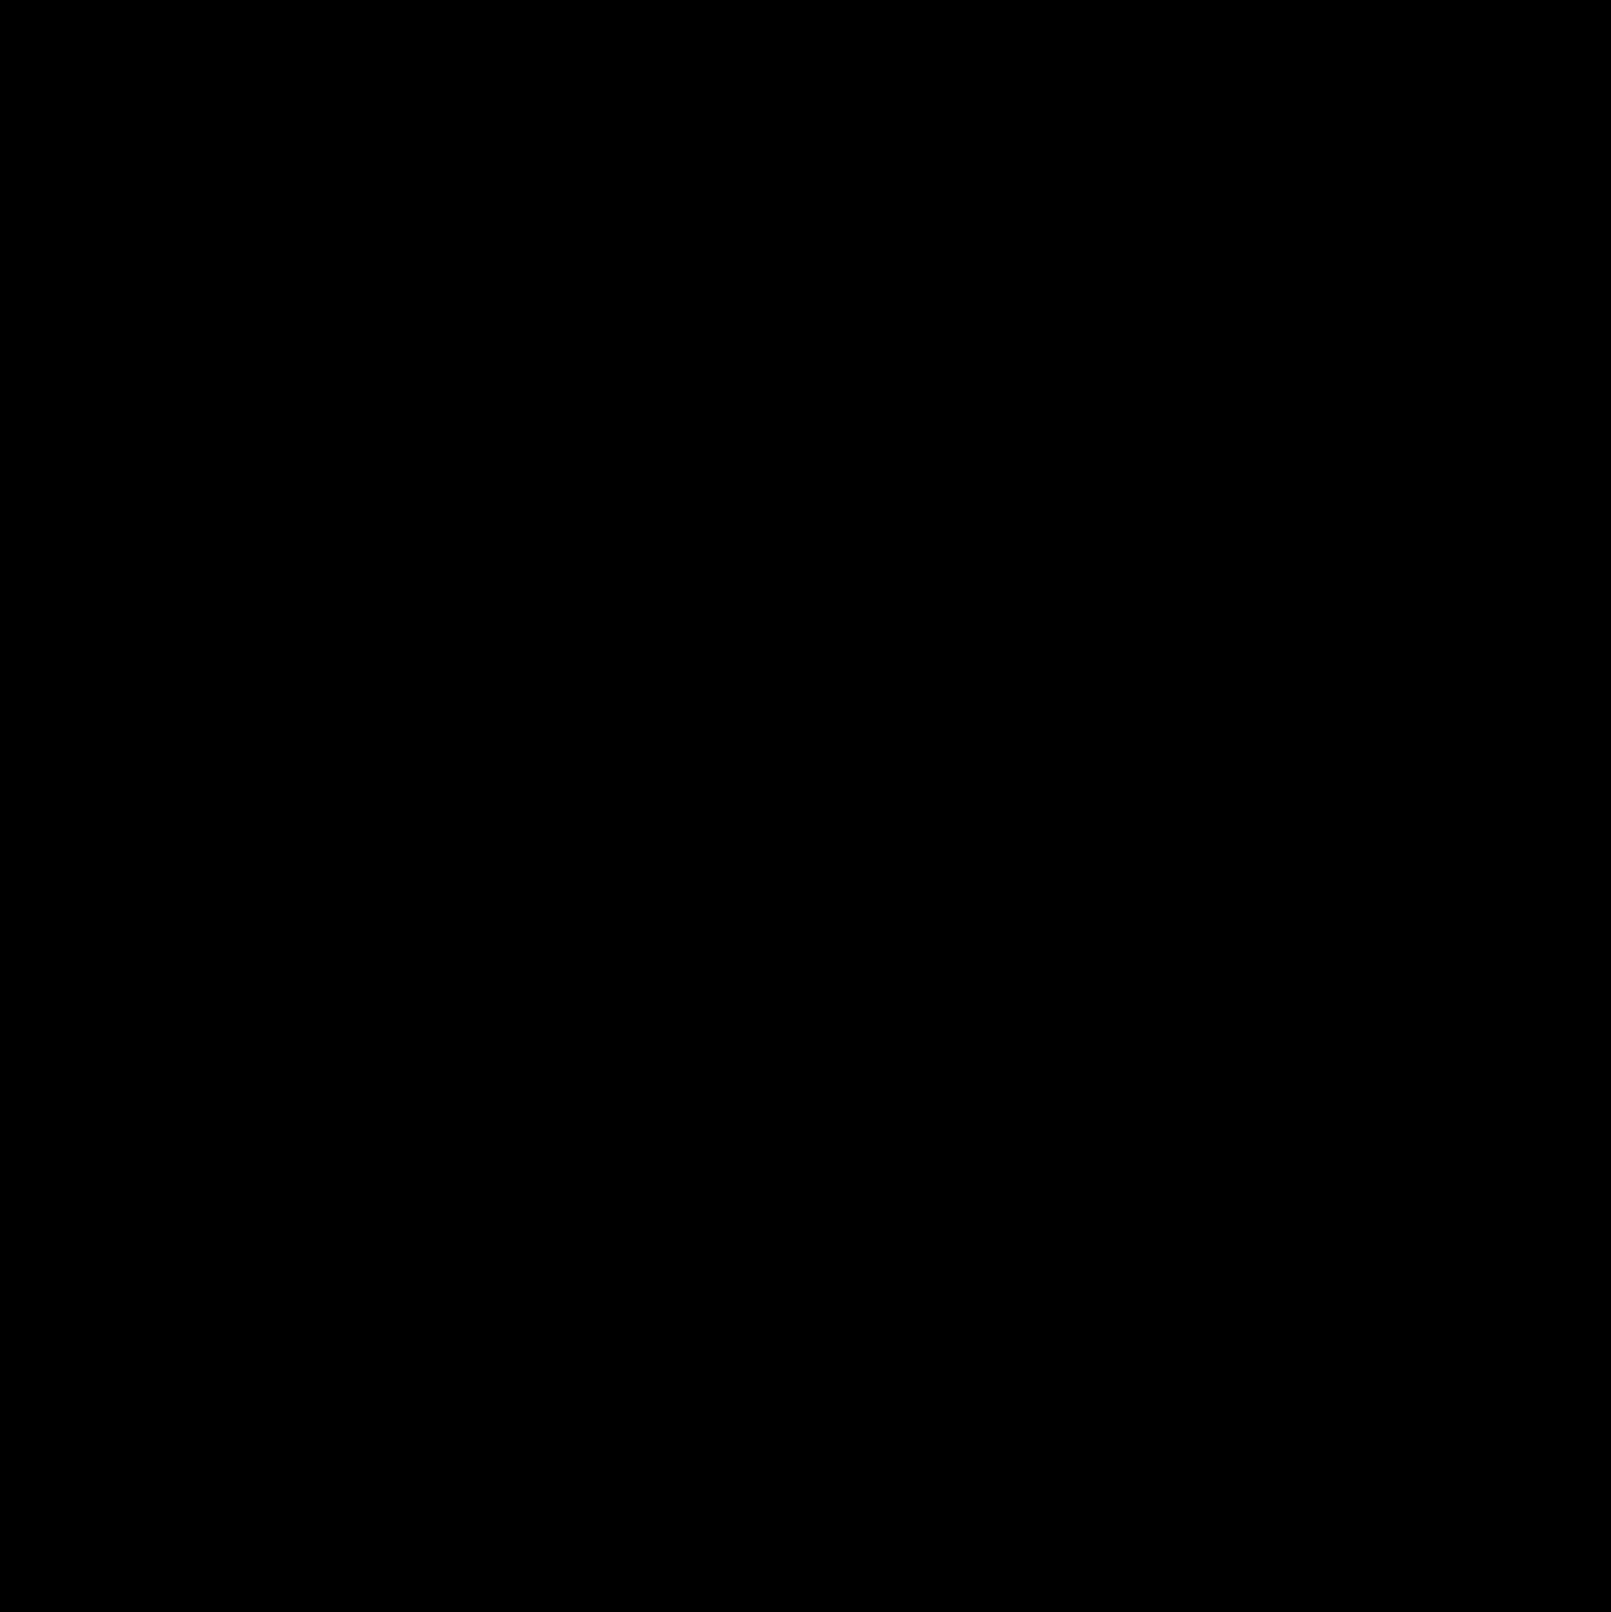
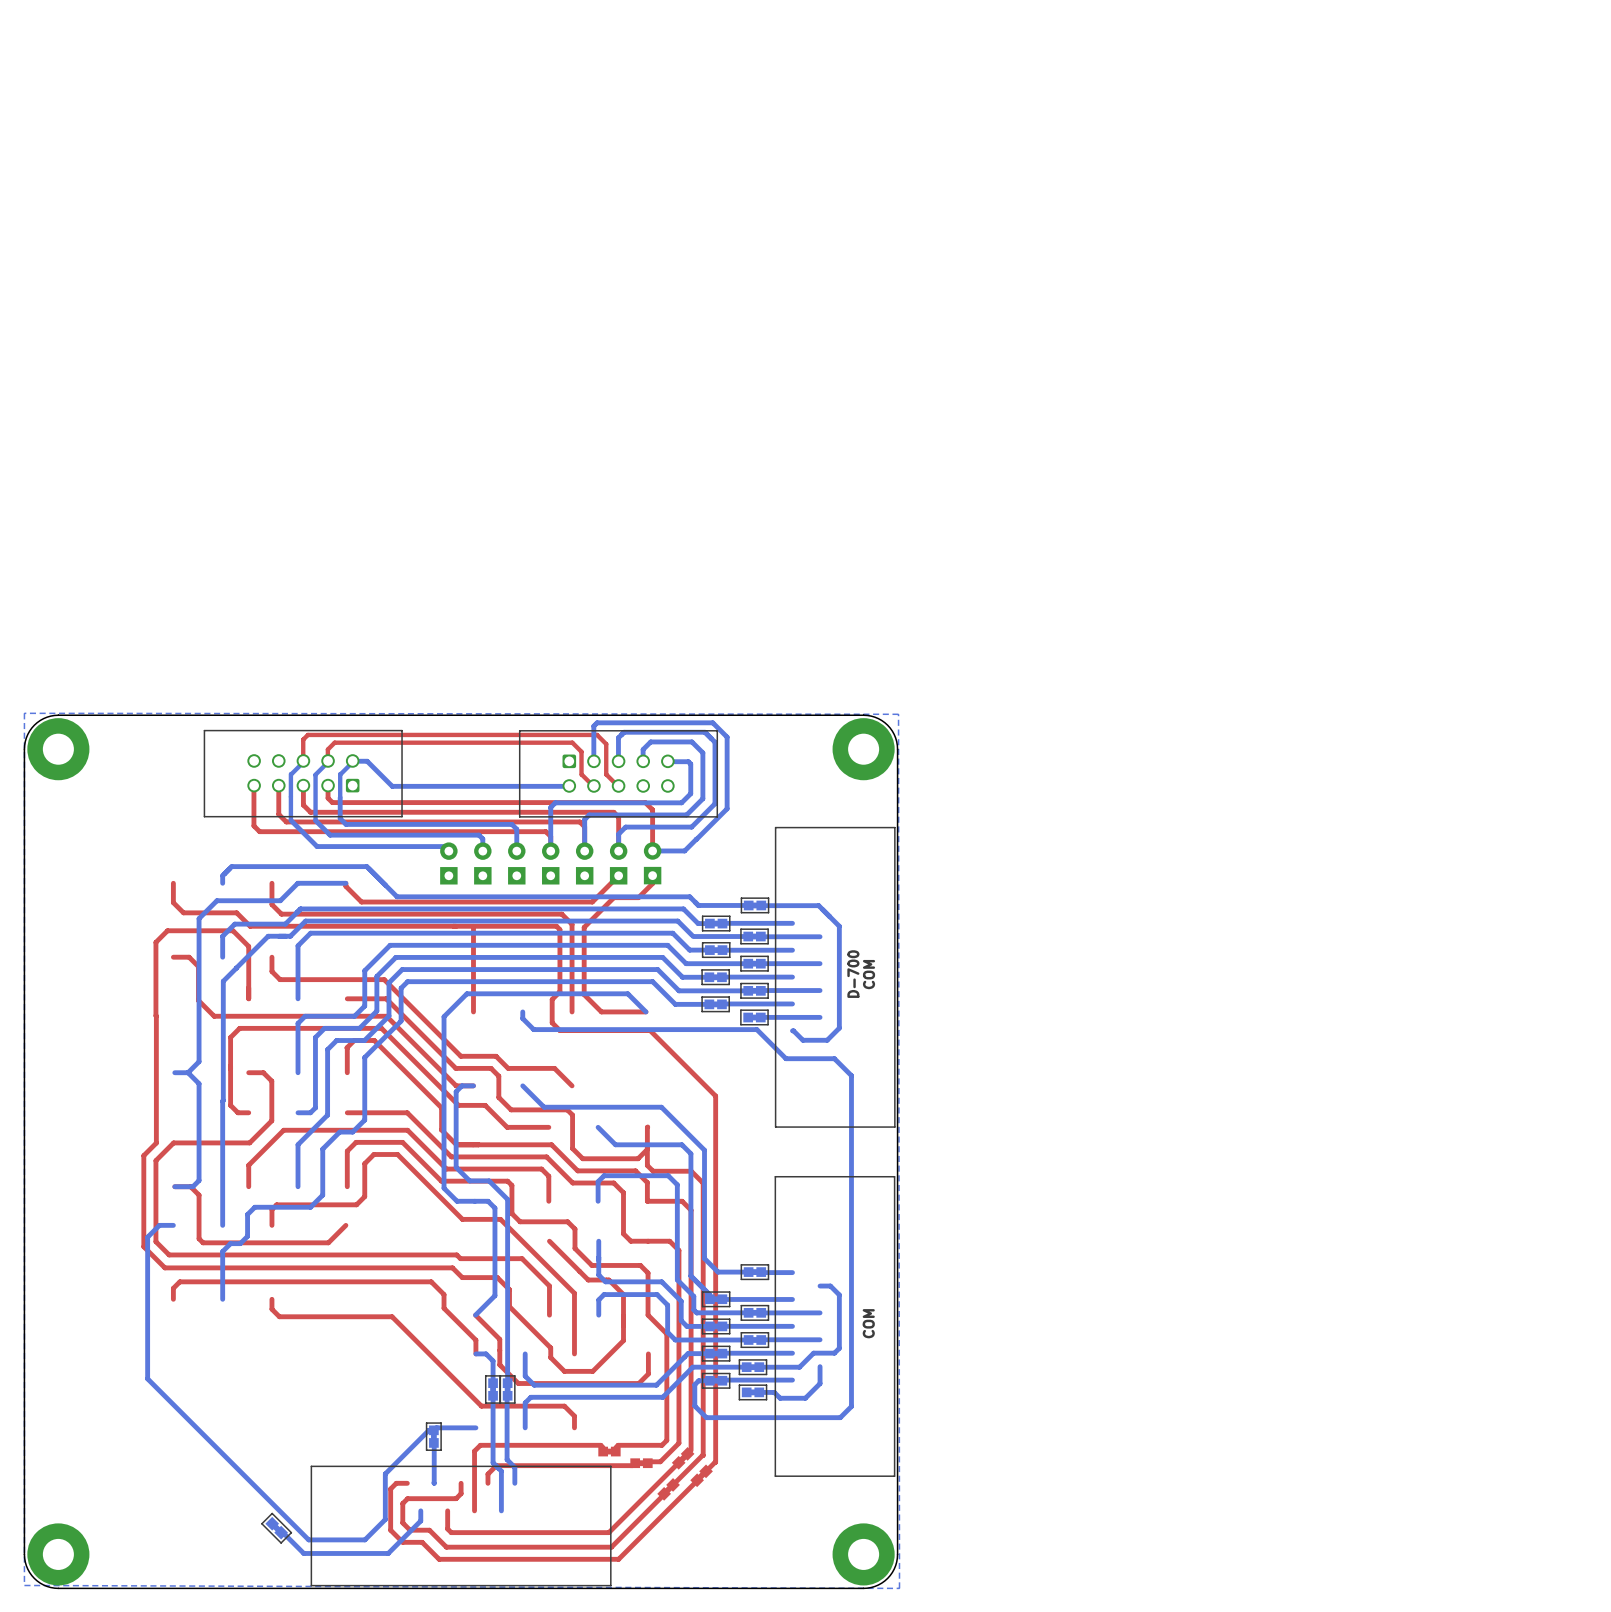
bottom zone outline: none -> (24, 713) (898, 714) (899, 1588) (24, 1585) (24, 713)
board edge: none -> (863, 715) (58, 715) (47, 717) (34, 725) (26, 737) (24, 749) (24, 1554) (26, 1565) (34, 1578) (47, 1586) (58, 1588) (863, 1588) (878, 1585) (887, 1578) (895, 1565) (897, 1554) (897, 749) (895, 737) (887, 725) (874, 717) (863, 715)
line: none -> (402, 730) (204, 730) (204, 816) (402, 816) (402, 730)
line: none -> (717, 730) (519, 730) (519, 816) (717, 816) (717, 730)
part: none -> (58, 749)
part: none -> (863, 749)
top track: none -> (303, 761) (303, 739) (307, 734) (597, 734) (606, 744) (606, 774)
top track: none -> (327, 761) (327, 749) (334, 742) (572, 742) (581, 751) (581, 774)
bottom track: none -> (352, 761) (367, 761) (392, 786) (569, 786)
bottom track: none -> (593, 761) (593, 726) (597, 722) (712, 722) (727, 737) (727, 808) (684, 850) (652, 850)
bottom track: none -> (618, 761) (618, 737) (624, 732) (705, 732) (715, 742) (715, 803) (691, 827) (625, 827) (618, 834) (618, 851)
bottom track: none -> (643, 761) (643, 749) (650, 741) (691, 741) (702, 752) (702, 798) (686, 814) (589, 814) (584, 819) (584, 851)
bottom track: none -> (667, 761) (688, 761) (690, 764) (690, 793) (681, 802) (555, 802) (550, 807) (550, 851)
bottom track: none -> (303, 762) (291, 774)
bottom track: none -> (328, 762) (315, 774)
bottom track: none -> (352, 762) (340, 774)
part: none -> (303, 773)
part: none -> (618, 773)
bottom track: none -> (290, 774) (290, 820) (317, 846) (445, 846) (448, 851)
bottom track: none -> (315, 774) (315, 820) (330, 835) (479, 835) (482, 838) (482, 851)
bottom track: none -> (340, 774) (340, 818) (346, 824) (511, 824) (516, 829) (516, 851)
top track: none -> (581, 774) (593, 786)
top track: none -> (606, 774) (618, 786)
top track: none -> (253, 785) (253, 825) (259, 831) (545, 831) (550, 836) (550, 851)
top track: none -> (278, 785) (278, 814) (286, 821) (579, 821) (584, 826) (584, 851)
top track: none -> (303, 785) (303, 805) (310, 812) (613, 812) (618, 817) (618, 851)
top track: none -> (328, 785) (328, 798) (332, 802) (645, 802) (652, 809) (652, 850)
line: none -> (894, 827) (894, 1127) (775, 1127) (775, 827) (894, 827)
part: none -> (448, 863)
part: none -> (482, 863)
part: none -> (516, 863)
part: none -> (550, 863)
part: none -> (584, 863)
part: none -> (618, 863)
part: none -> (652, 863)
top track: none -> (618, 875) (592, 902) (361, 902) (345, 886) (345, 883)
top track: none -> (652, 875) (652, 883) (638, 897) (613, 897) (584, 927) (584, 994) (601, 1011) (645, 1011)
top track: none -> (173, 883) (173, 902) (183, 912) (236, 912) (250, 926) (556, 926) (559, 929) (559, 991) (552, 999) (552, 1022) (559, 1030) (650, 1030) (715, 1096) (715, 1462) (706, 1471)
bottom track: none -> (222, 883) (222, 875) (231, 866) (366, 866) (397, 896) (689, 896) (698, 905)
top track: none -> (271, 883) (271, 904) (281, 914) (561, 914) (572, 924) (572, 1011)
bottom track: none -> (345, 883) (297, 883) (280, 900) (216, 900) (199, 918) (199, 1061) (188, 1072)
bottom track: none -> (748, 905) (698, 905)
part: none -> (754, 905)
bottom track: none -> (761, 905) (818, 905) (839, 926) (839, 1028) (827, 1040) (802, 1040) (792, 1030)
bottom track: none -> (709, 923) (698, 923) (683, 908) (300, 908) (285, 924) (234, 924) (222, 936) (222, 957)
part: none -> (716, 923)
bottom track: none -> (792, 923) (722, 923)
top track: none -> (473, 926) (473, 1011)
bottom track: none -> (692, 935) (677, 921) (305, 921) (290, 936) (268, 936) (223, 981) (222, 1225)
bottom track: none -> (748, 936) (693, 936)
part: none -> (754, 936)
bottom track: none -> (760, 936) (820, 936)
bottom track: none -> (709, 950) (689, 950) (672, 933) (310, 933) (298, 945) (298, 998)
part: none -> (716, 950)
bottom track: none -> (792, 950) (722, 950)
top track: none -> (173, 957) (189, 957) (198, 966) (198, 1000) (214, 1016) (386, 1016) (456, 1085) (473, 1085)
top track: none -> (271, 957) (271, 971) (280, 979) (384, 979) (460, 1056) (496, 1056) (508, 1068) (554, 1068) (572, 1085)
bottom track: none -> (748, 963) (686, 963) (667, 945) (390, 945) (364, 970) (364, 1006) (354, 1016) (305, 1016) (298, 1023) (298, 1072)
part: none -> (754, 963)
bottom track: none -> (820, 963) (760, 963)
text: none -> D-700 (853, 974)
text: none -> COM (869, 974)
bottom track: none -> (709, 977) (682, 977) (662, 957) (395, 957) (376, 976) (376, 1011) (359, 1028) (324, 1028) (315, 1037) (315, 1107) (310, 1112) (298, 1112)
part: none -> (715, 977)
bottom track: none -> (792, 977) (721, 977)
bottom track: none -> (748, 990) (679, 990) (657, 969) (402, 969) (389, 982) (389, 1016) (364, 1040) (336, 1040) (327, 1049) (327, 1115) (298, 1144) (298, 1186)
part: none -> (754, 990)
bottom track: none -> (820, 990) (760, 990)
top track: none -> (248, 998) (248, 946) (233, 930) (167, 930) (155, 942) (156, 1143) (143, 1155) (143, 1246) (164, 1267) (452, 1267) (462, 1277) (497, 1277) (509, 1289) (509, 1306) (550, 1347) (550, 1357) (564, 1371) (592, 1371) (623, 1340) (623, 1294) (608, 1280) (588, 1280) (549, 1241)
top track: none -> (347, 998) (386, 998) (455, 1068) (491, 1068) (498, 1076) (498, 1097) (511, 1109) (567, 1109) (572, 1115) (572, 1148) (582, 1158) (638, 1158) (647, 1149)
bottom track: none -> (792, 1003) (721, 1004)
bottom track: none -> (709, 1004) (675, 1004) (652, 981) (407, 981) (401, 988) (401, 1021) (364, 1057) (364, 1120) (352, 1132) (339, 1132) (322, 1149) (322, 1195) (310, 1207) (254, 1207) (247, 1214) (247, 1236) (240, 1243) (230, 1243) (222, 1251) (222, 1299)
part: none -> (715, 1004)
bottom track: none -> (522, 1011) (522, 1018) (533, 1029) (756, 1029) (786, 1058) (834, 1058) (851, 1075) (851, 1406) (840, 1417) (706, 1417) (694, 1406) (694, 1384) (698, 1380) (707, 1380)
bottom track: none -> (645, 1011) (627, 993) (466, 993) (444, 1016) (444, 1188) (457, 1201) (488, 1201) (494, 1208) (494, 1295) (475, 1315)
part: none -> (754, 1017)
bottom track: none -> (820, 1017) (760, 1017)
bottom track: none -> (188, 1072) (174, 1072)
bottom track: none -> (188, 1072) (199, 1083) (199, 1180) (192, 1186) (174, 1186)
top track: none -> (248, 1072) (263, 1072) (271, 1081) (271, 1120) (249, 1142) (173, 1142) (155, 1160) (155, 1241) (169, 1254) (456, 1254) (460, 1258) (522, 1258) (549, 1286) (549, 1315)
top track: none -> (347, 1072) (347, 1047) (354, 1040) (374, 1040) (441, 1107) (441, 1129) (456, 1144) (551, 1144) (577, 1170) (635, 1170) (647, 1182) (647, 1201) (682, 1201) (691, 1210) (691, 1450)
bottom track: none -> (473, 1085) (461, 1085) (456, 1091) (456, 1167) (469, 1180) (489, 1180) (507, 1199) (507, 1383)
bottom track: none -> (522, 1085) (544, 1107) (661, 1107) (704, 1150) (704, 1258) (718, 1272) (746, 1272)
top track: none -> (248, 1112) (237, 1112) (230, 1105) (230, 1037) (239, 1028) (381, 1028) (458, 1105) (485, 1105) (507, 1127) (548, 1127)
top track: none -> (347, 1112) (407, 1112) (451, 1156) (546, 1156) (572, 1183) (613, 1183) (623, 1192) (623, 1233) (630, 1241) (669, 1241) (678, 1250) (678, 1443) (660, 1461) (650, 1461)
top track: none -> (647, 1126) (647, 1165) (653, 1171) (691, 1171) (703, 1183) (703, 1455) (673, 1484)
bottom track: none -> (598, 1127) (615, 1144) (681, 1144) (690, 1153) (690, 1276) (709, 1294) (709, 1299)
line: none -> (894, 1176) (894, 1476) (775, 1476) (775, 1176) (894, 1176)
top track: none -> (174, 1186) (190, 1186) (199, 1195) (199, 1238) (203, 1242) (328, 1242) (345, 1225)
top track: none -> (248, 1186) (248, 1165) (283, 1130) (407, 1130) (446, 1169) (541, 1169) (548, 1176) (548, 1201)
top track: none -> (347, 1186) (347, 1151) (356, 1142) (402, 1142) (441, 1181) (507, 1181) (511, 1185) (511, 1213) (520, 1221) (567, 1221) (574, 1229) (574, 1248) (591, 1265) (640, 1265) (648, 1273) (648, 1315) (666, 1333) (666, 1440) (661, 1445) (618, 1445) (615, 1447)
bottom track: none -> (598, 1201) (598, 1181) (604, 1175) (668, 1175) (677, 1184) (677, 1279) (693, 1296) (693, 1309) (696, 1312)
bottom track: none -> (173, 1225) (159, 1225) (147, 1237) (147, 1378) (308, 1539) (364, 1539) (385, 1519) (385, 1473) (428, 1430) (433, 1430) (436, 1427) (475, 1427)
top track: none -> (271, 1225) (271, 1209) (276, 1204) (356, 1204) (364, 1196) (364, 1163) (373, 1154) (397, 1154) (462, 1219) (500, 1219) (574, 1293) (574, 1353)
bottom track: none -> (598, 1241) (598, 1275) (605, 1281) (661, 1281) (681, 1301) (681, 1320) (686, 1326) (707, 1326)
part: none -> (754, 1272)
bottom track: none -> (759, 1272) (792, 1272)
bottom track: none -> (820, 1286) (830, 1286) (839, 1294) (839, 1348) (834, 1353) (813, 1353) (799, 1367) (757, 1367)
top track: none -> (173, 1299) (173, 1288) (179, 1281) (431, 1281) (444, 1294) (444, 1308) (475, 1340) (475, 1353)
top track: none -> (271, 1299) (271, 1309) (279, 1316) (392, 1316) (481, 1406) (564, 1406) (574, 1416) (574, 1427)
part: none -> (716, 1299)
bottom track: none -> (722, 1299) (792, 1299)
bottom track: none -> (748, 1312) (696, 1312)
part: none -> (754, 1312)
bottom track: none -> (820, 1312) (761, 1312)
top track: none -> (475, 1315) (499, 1339) (499, 1364) (518, 1383) (638, 1383) (648, 1373) (648, 1353)
bottom track: none -> (598, 1315) (598, 1299) (604, 1294) (657, 1294) (667, 1305) (667, 1332) (675, 1339) (746, 1339)
text: none -> COM (868, 1323)
part: none -> (716, 1326)
bottom track: none -> (792, 1326) (722, 1326)
bottom track: none -> (820, 1339) (759, 1339)
part: none -> (754, 1340)
bottom track: none -> (475, 1353) (486, 1353) (493, 1360) (493, 1383)
bottom track: none -> (707, 1353) (688, 1353) (656, 1385) (534, 1385) (525, 1376) (525, 1353)
part: none -> (716, 1353)
bottom track: none -> (792, 1353) (720, 1353)
bottom track: none -> (820, 1366) (820, 1383) (805, 1398) (780, 1398) (774, 1392) (757, 1392)
bottom track: none -> (744, 1367) (692, 1367) (662, 1397) (530, 1397) (525, 1402) (525, 1427)
part: none -> (752, 1367)
part: none -> (716, 1380)
bottom track: none -> (792, 1380) (720, 1380)
part: none -> (493, 1389)
part: none -> (507, 1389)
part: none -> (752, 1392)
bottom track: none -> (493, 1395) (493, 1462) (501, 1471) (501, 1510)
bottom track: none -> (507, 1395) (507, 1459) (514, 1467) (514, 1483)
part: none -> (433, 1436)
bottom track: none -> (433, 1442) (433, 1482)
top track: none -> (603, 1447) (600, 1445) (480, 1445) (474, 1451) (474, 1510)
part: none -> (609, 1451)
part: none -> (683, 1458)
top track: none -> (678, 1462) (608, 1532) (451, 1532) (447, 1528) (447, 1510)
part: none -> (641, 1463)
top track: none -> (632, 1465) (496, 1465) (487, 1474) (487, 1483)
line: none -> (610, 1466) (311, 1466) (311, 1585) (610, 1585) (610, 1466)
part: none -> (701, 1475)
top track: none -> (697, 1480) (618, 1559) (439, 1559) (422, 1542) (402, 1542) (390, 1530) (390, 1488) (396, 1483) (407, 1483)
top track: none -> (461, 1483) (461, 1493) (456, 1498) (407, 1498) (402, 1503) (402, 1522) (410, 1530) (429, 1530) (446, 1547) (611, 1547) (664, 1493)
part: none -> (668, 1489)
bottom track: none -> (420, 1510) (420, 1520) (388, 1553) (303, 1553) (281, 1532)
part: none -> (276, 1528)
part: none -> (58, 1554)
part: none -> (863, 1554)

